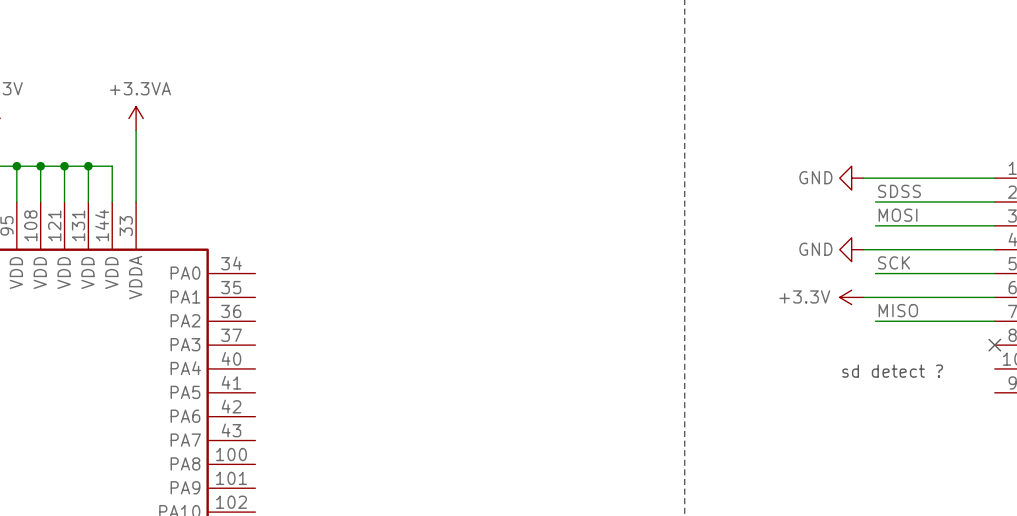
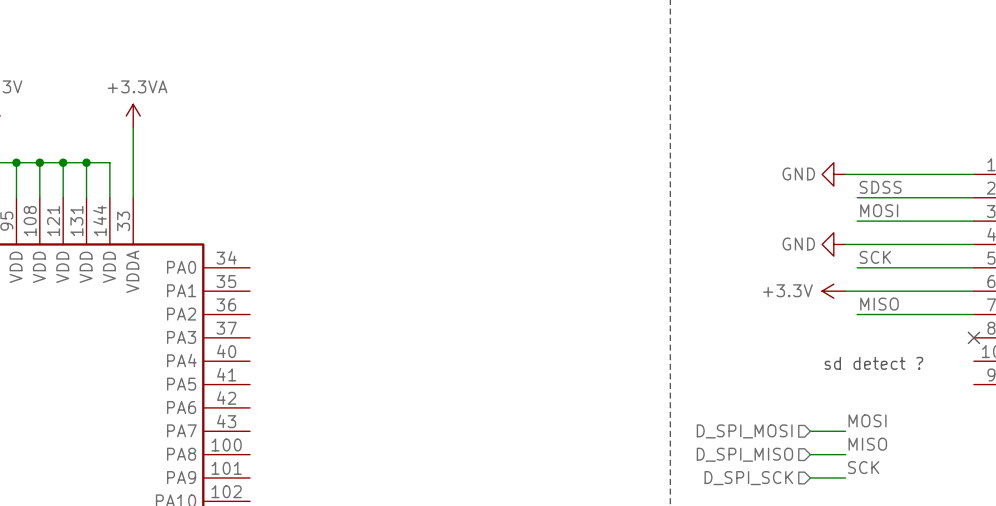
label: none -> MOSI (867, 420)
hierarchical label: none -> D_SPI_MOSI (744, 431)
wire: none -> (810, 431) (845, 431)
label: none -> MISO (867, 444)
hierarchical label: none -> D_SPI_MISO (744, 454)
wire: none -> (810, 454) (845, 454)
label: none -> SCK (863, 467)
hierarchical label: none -> D_SPI_SCK (748, 478)
wire: none -> (810, 477) (845, 477)

